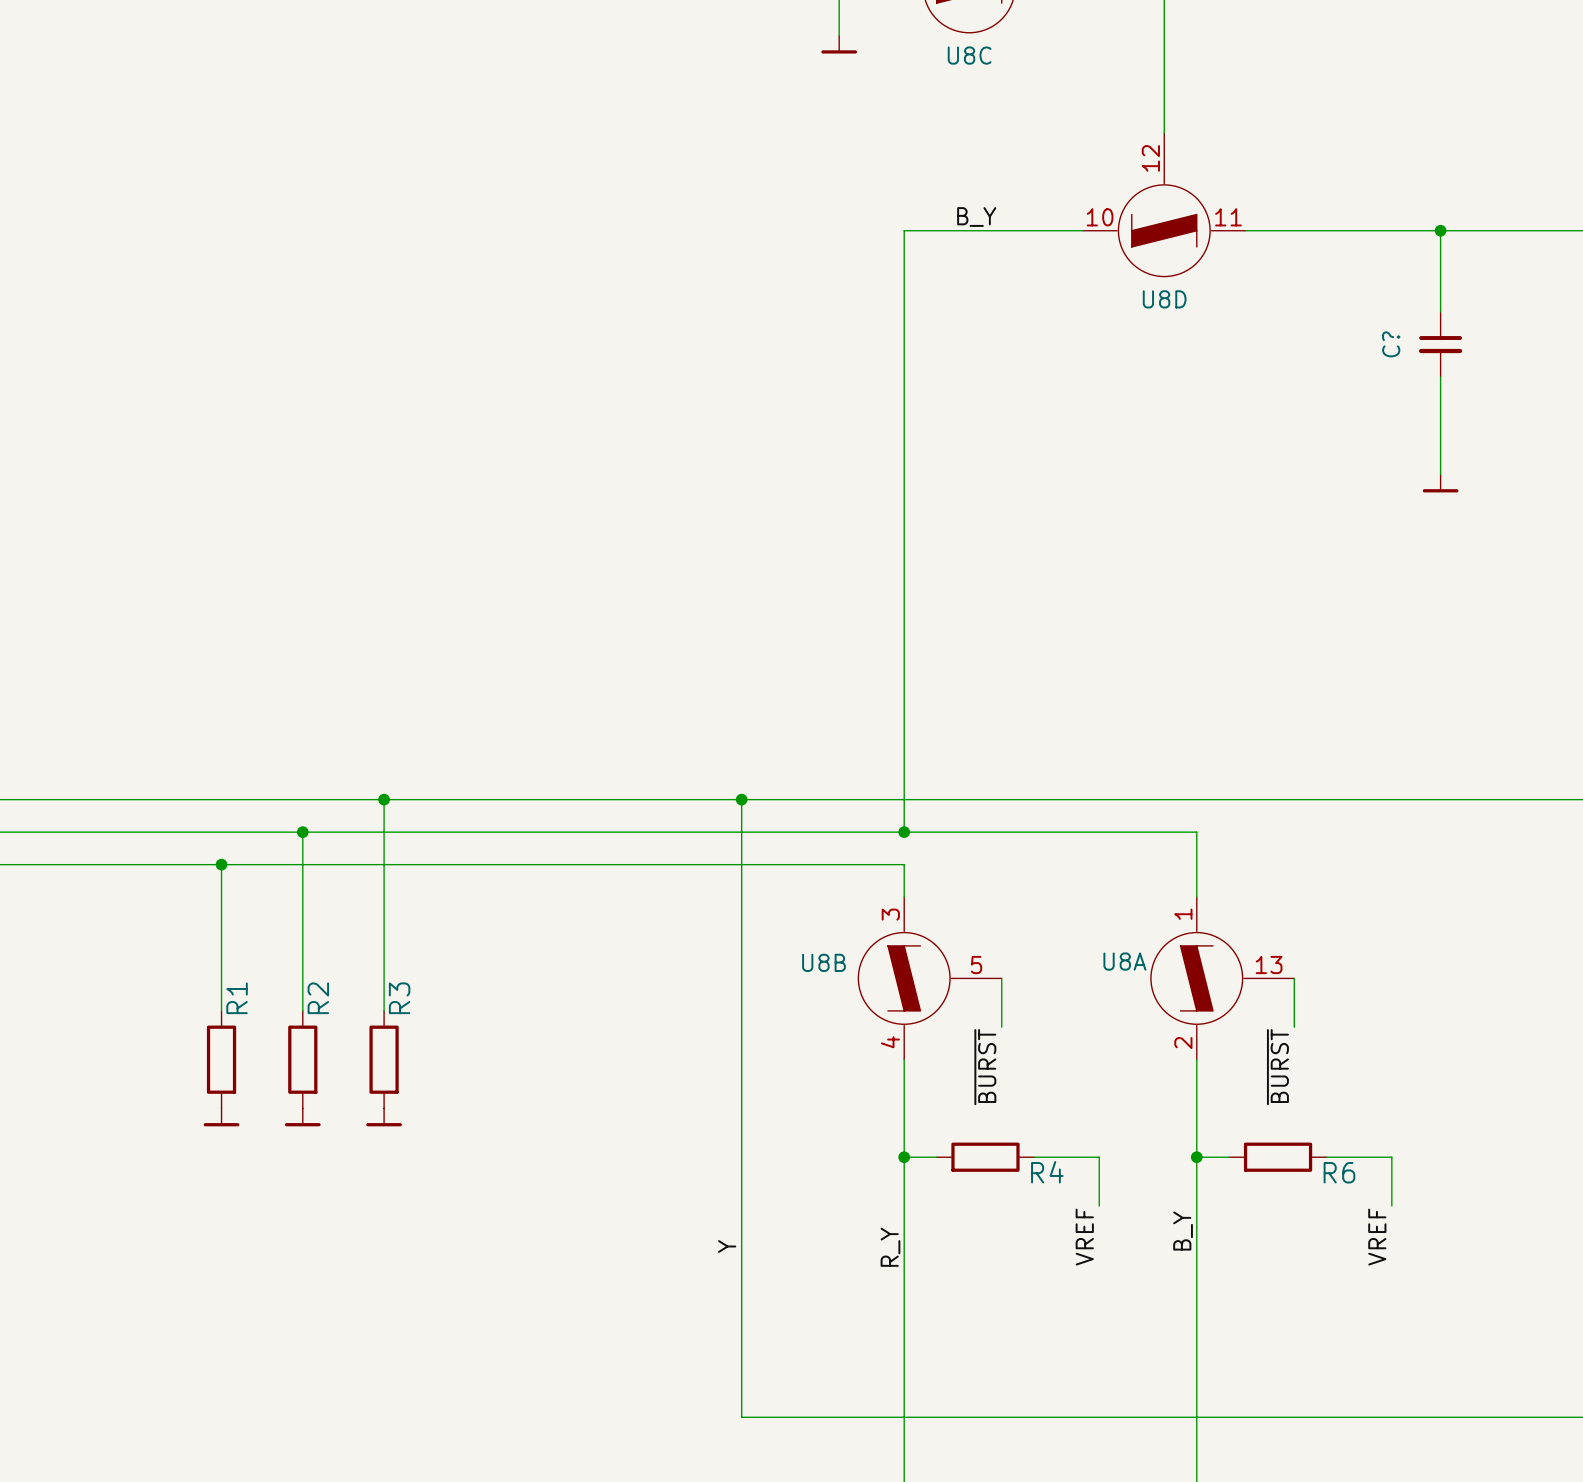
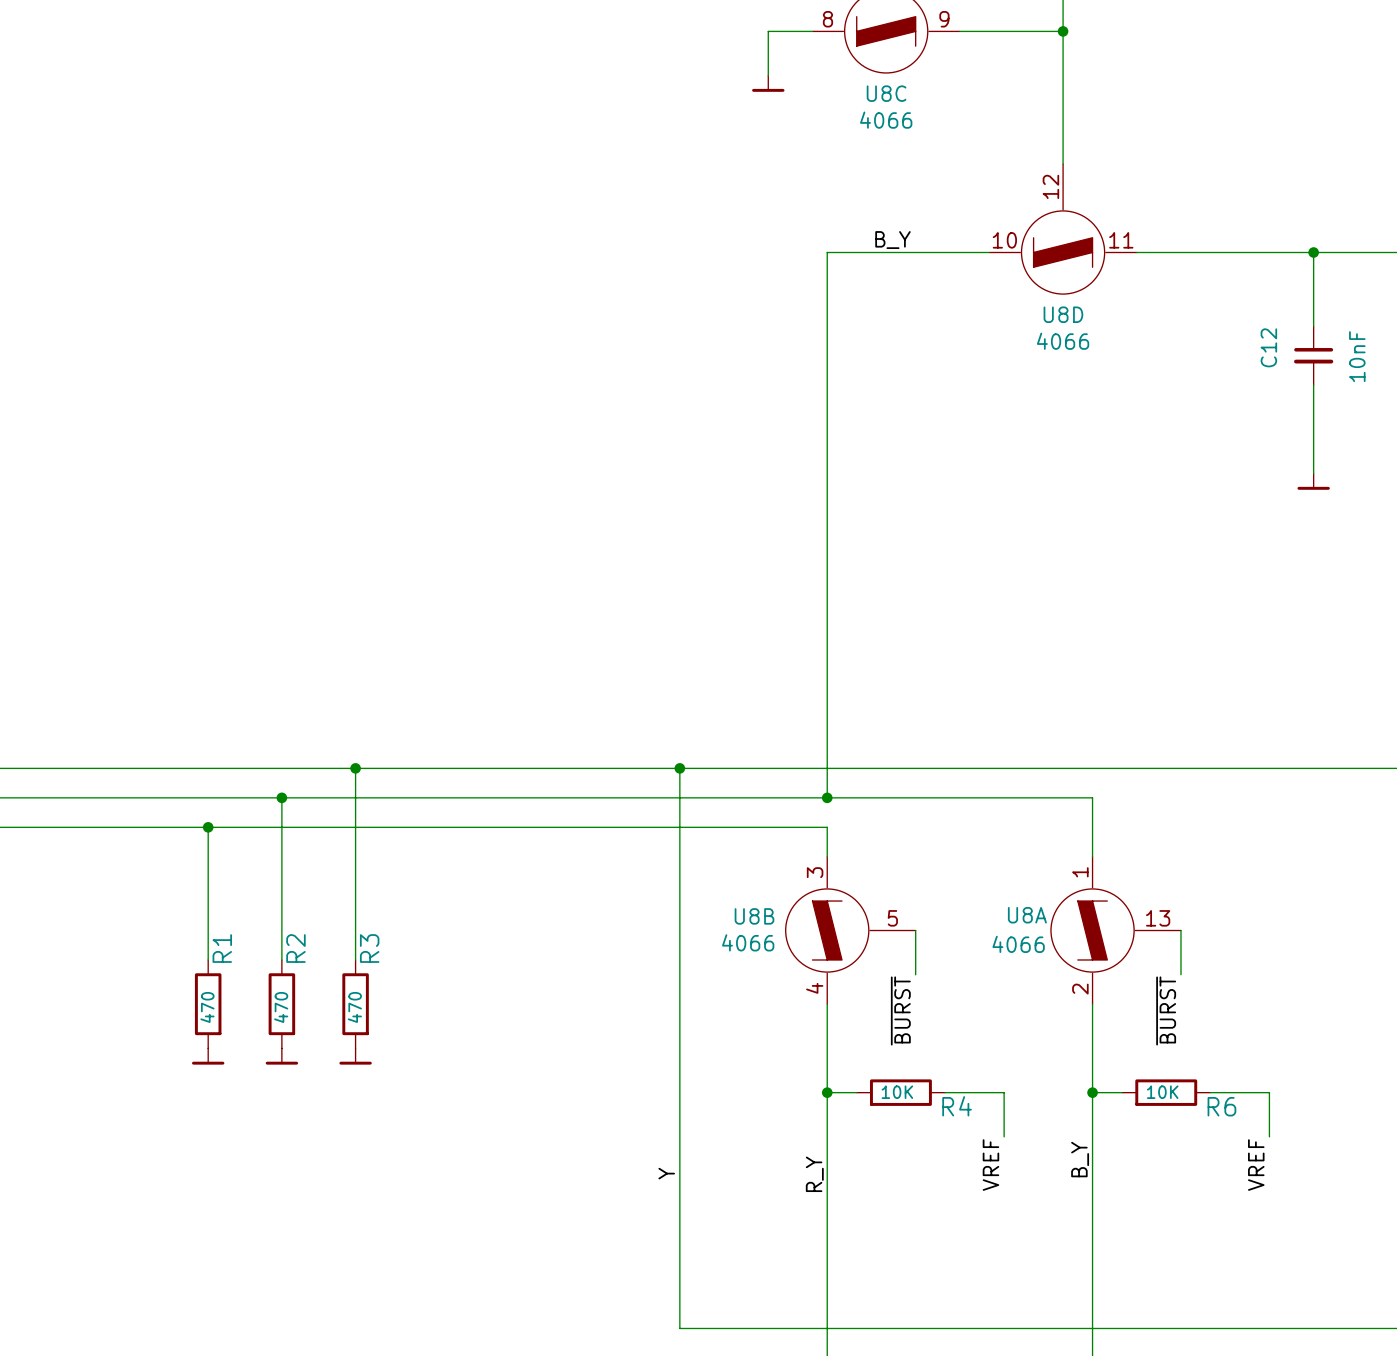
U8C value: none -> 4066 (886, 120)
U8D value: none -> 4066 (1063, 341)
C? name: C? (1391, 344) -> C12 (1268, 347)
C? value: none -> 10nF (1357, 356)
U8B value: none -> 4066 (748, 942)
U8A value: none -> 4066 (1018, 944)
R1 value: none -> 470 (207, 1007)
R2 value: none -> 470 (281, 1007)
R3 value: none -> 470 (354, 1007)
R4 value: none -> 10K (897, 1092)
R6 value: none -> 10K (1162, 1092)

